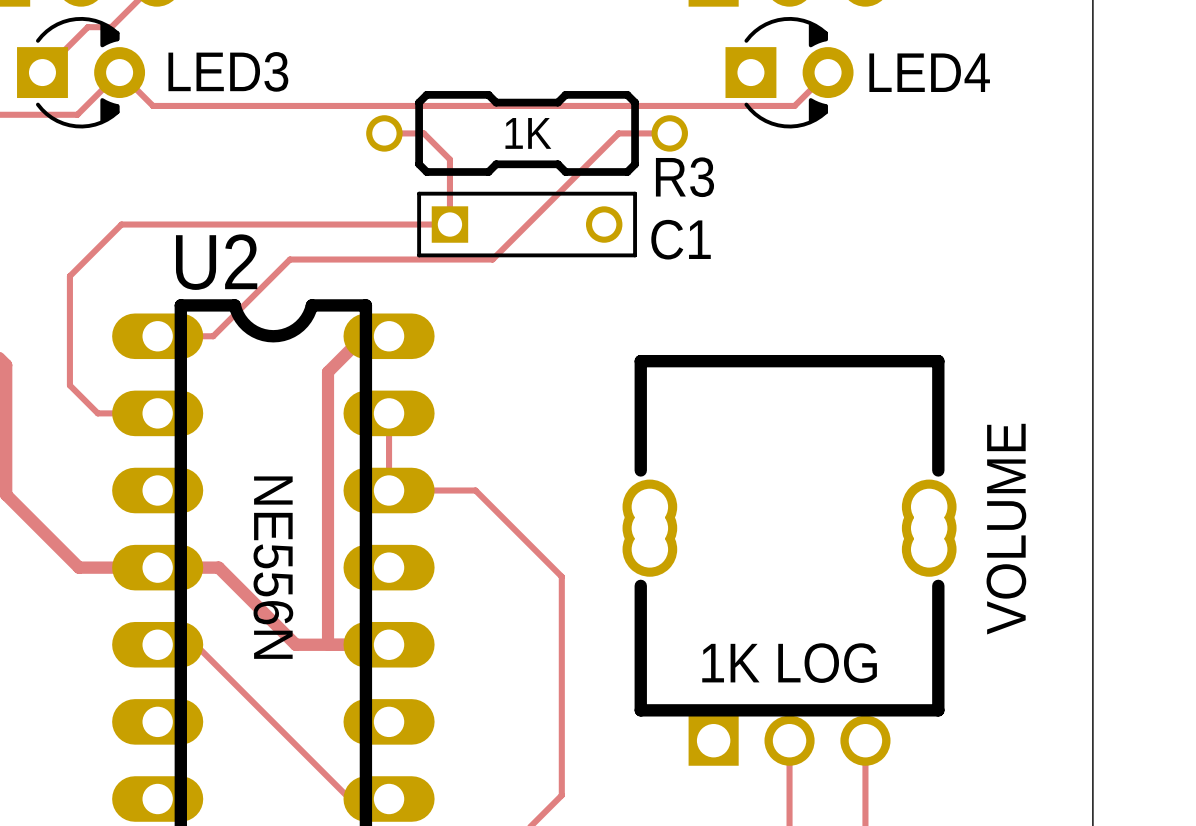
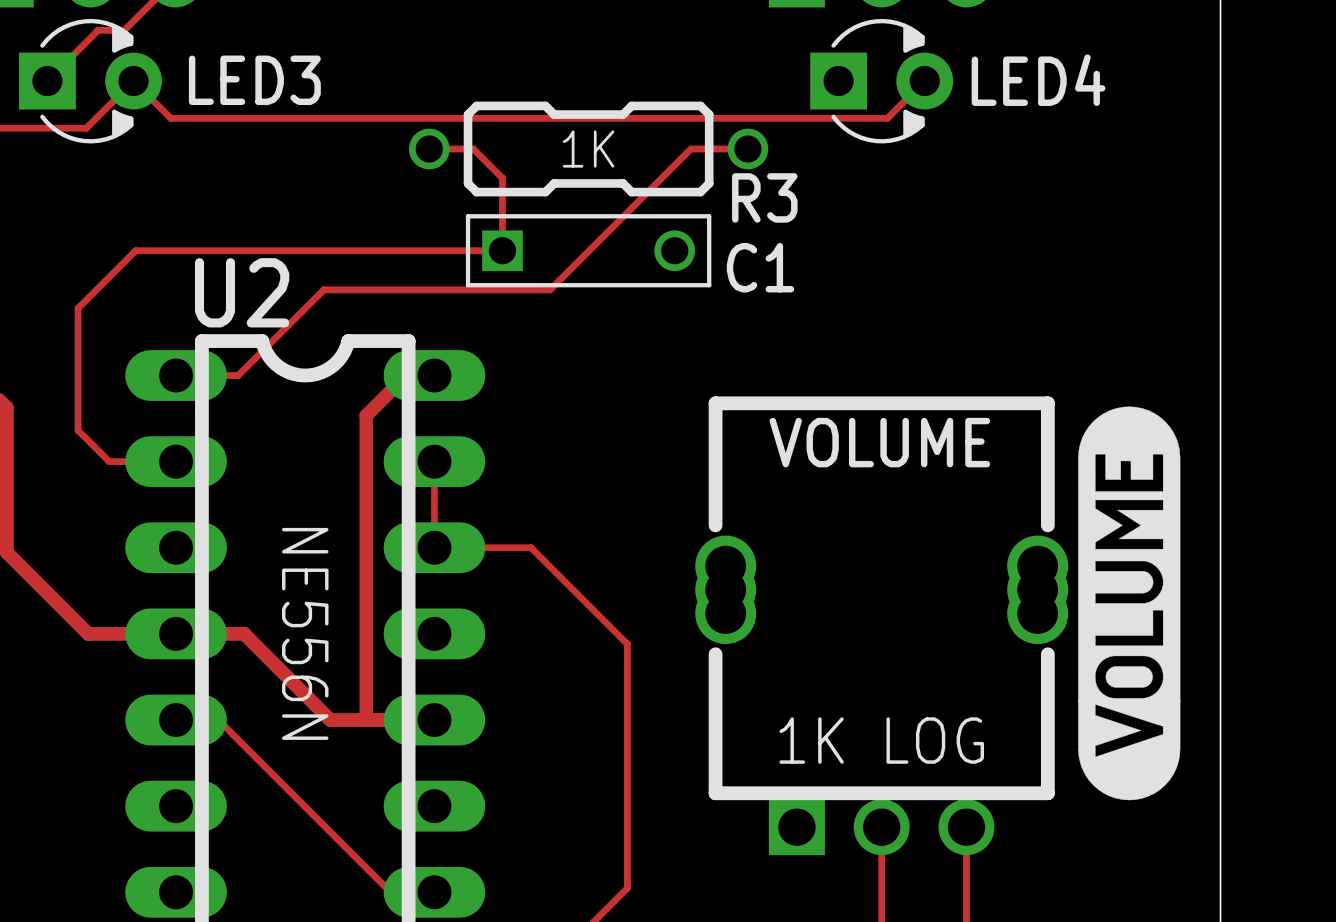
drawing: none -> [1078, 406, 1181, 801]
VOLUME name rotation: 0° (1006, 529) -> 90° clockwise (879, 442)
VOLUME name position: VOLUME (1006, 529) -> VOLUME (879, 442)

